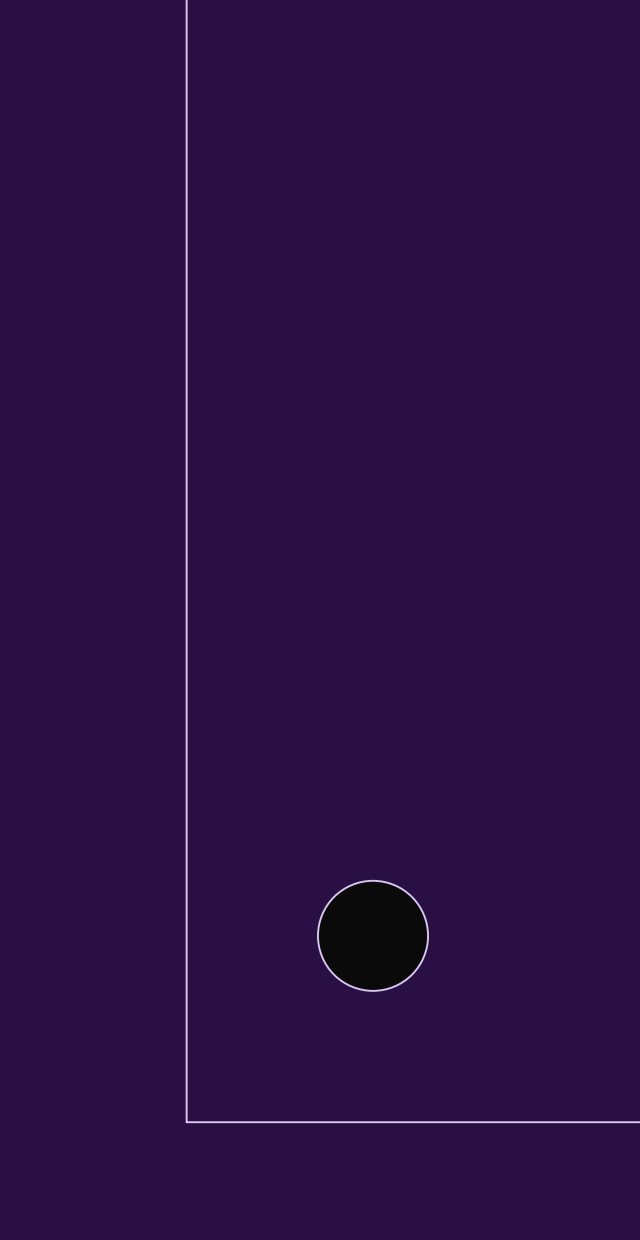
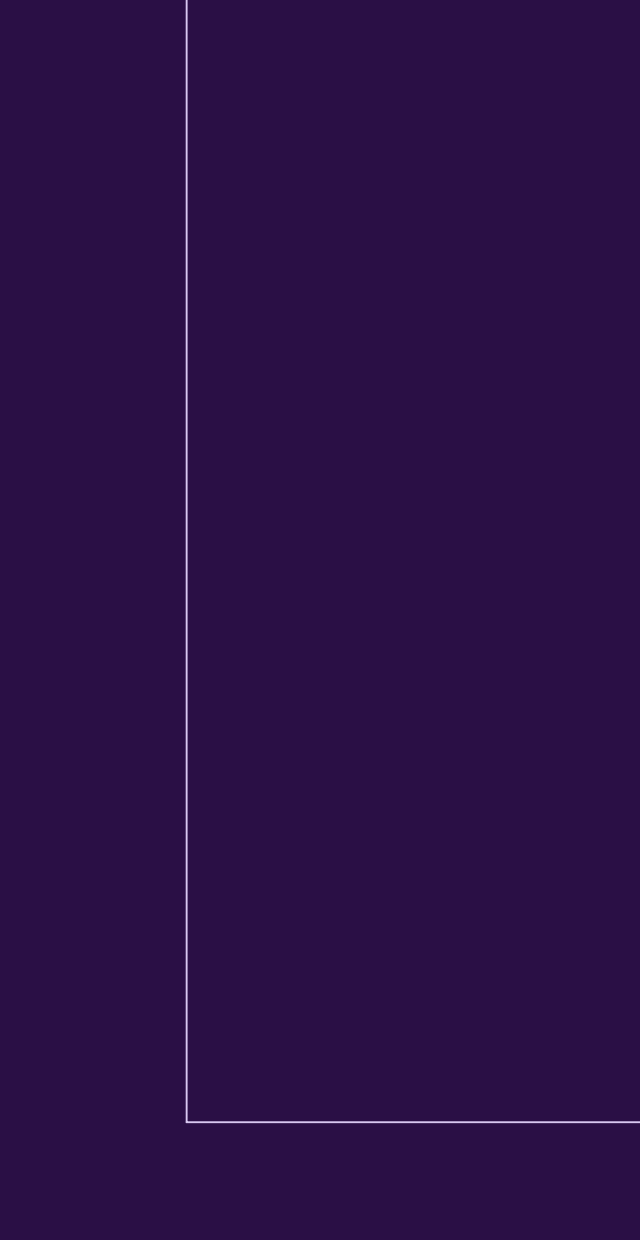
hole: (373, 935) -> none

